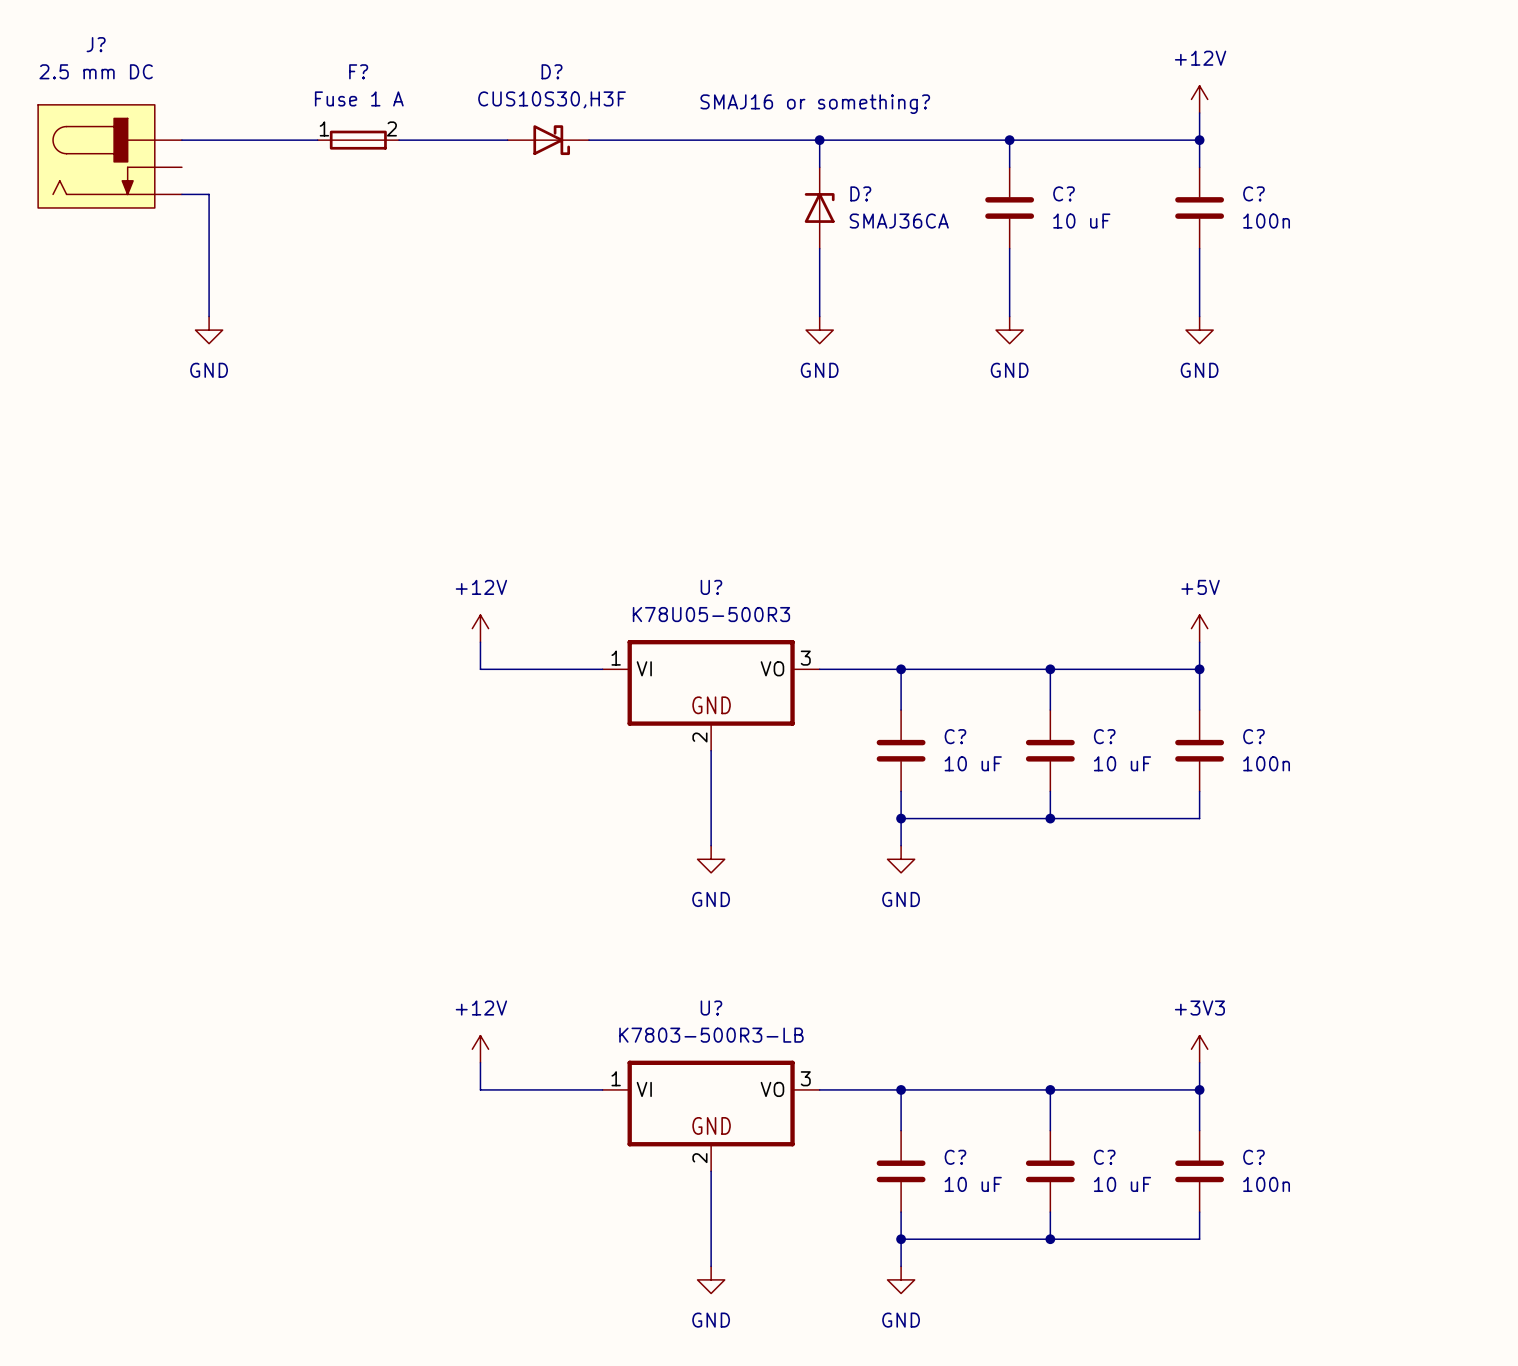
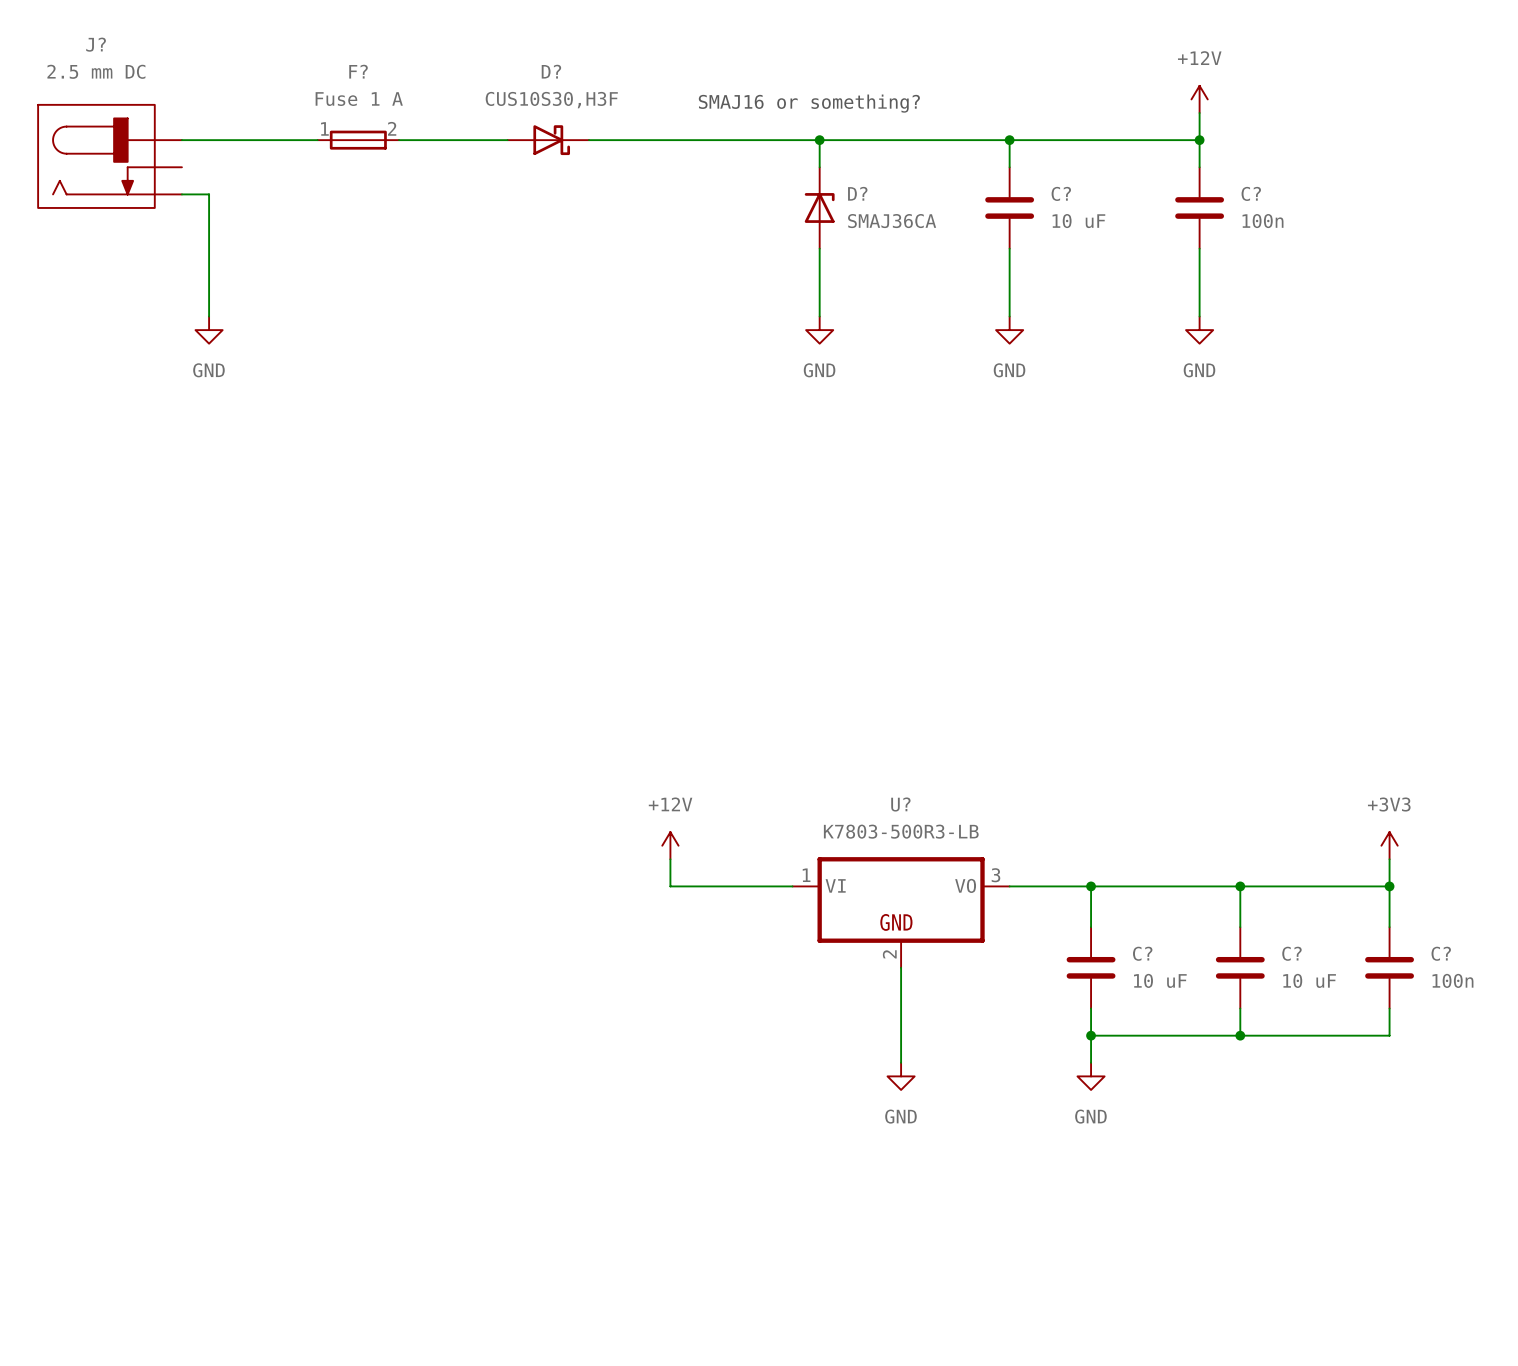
power symbol: +12V (480, 628) -> none
power symbol: +5V (1199, 628) -> none
wire: (480, 642) (480, 669) (602, 669) -> none
wire: (1199, 642) (1199, 710) -> none
wire: (819, 669) (1199, 669) -> none
wire: (901, 669) (901, 710) -> none
junction: (901, 669) -> none
wire: (1050, 669) (1050, 710) -> none
junction: (1050, 669) -> none
junction: (1199, 669) -> none
U?: (711, 695) -> none
wire: (711, 750) (711, 845) -> none
C?: (901, 750) -> none
C?: (1050, 750) -> none
C?: (1199, 750) -> none
wire: (901, 791) (901, 845) -> none
wire: (1050, 791) (1050, 818) -> none
wire: (1199, 791) (1199, 818) (901, 818) -> none
junction: (901, 818) -> none
junction: (1050, 818) -> none
power symbol: none -> +12V (670, 845)
power symbol: none -> +3V3 (1389, 845)
wire: none -> (670, 859) (670, 886) (792, 886)
power symbol: GND (711, 859) -> none
power symbol: GND (901, 859) -> none
wire: none -> (1389, 859) (1389, 927)
wire: none -> (1009, 886) (1389, 886)
junction: none -> (1091, 886)
wire: none -> (1240, 886) (1240, 927)
junction: none -> (1240, 886)
junction: none -> (1389, 886)
U?: none -> (901, 912)
wire: none -> (901, 967) (901, 1062)
C?: none -> (1091, 967)
C?: none -> (1240, 967)
C?: none -> (1389, 967)
wire: none -> (1091, 1008) (1091, 1062)
wire: none -> (1240, 1008) (1240, 1035)
wire: none -> (1389, 1008) (1389, 1035) (1091, 1035)
junction: none -> (1091, 1035)
junction: none -> (1240, 1035)
power symbol: +12V (480, 1049) -> none
power symbol: +3V3 (1199, 1049) -> none
wire: (480, 1062) (480, 1089) (602, 1089) -> none
wire: (1199, 1062) (1199, 1130) -> none
power symbol: none -> GND (901, 1076)
power symbol: none -> GND (1091, 1076)
wire: (819, 1089) (1199, 1089) -> none
wire: (901, 1089) (901, 1130) -> none
junction: (901, 1089) -> none
wire: (1050, 1089) (1050, 1130) -> (1091, 886) (1091, 927)
junction: (1050, 1089) -> none
junction: (1199, 1089) -> none
U?: (711, 1116) -> none
wire: (711, 1171) (711, 1266) -> none
C?: (901, 1171) -> none
C?: (1050, 1171) -> none
C?: (1199, 1171) -> none
wire: (901, 1212) (901, 1266) -> none
wire: (1050, 1212) (1050, 1239) -> none
wire: (1199, 1212) (1199, 1239) (901, 1239) -> none
junction: (901, 1239) -> none
junction: (1050, 1239) -> none
power symbol: GND (711, 1279) -> none
power symbol: GND (901, 1279) -> none

